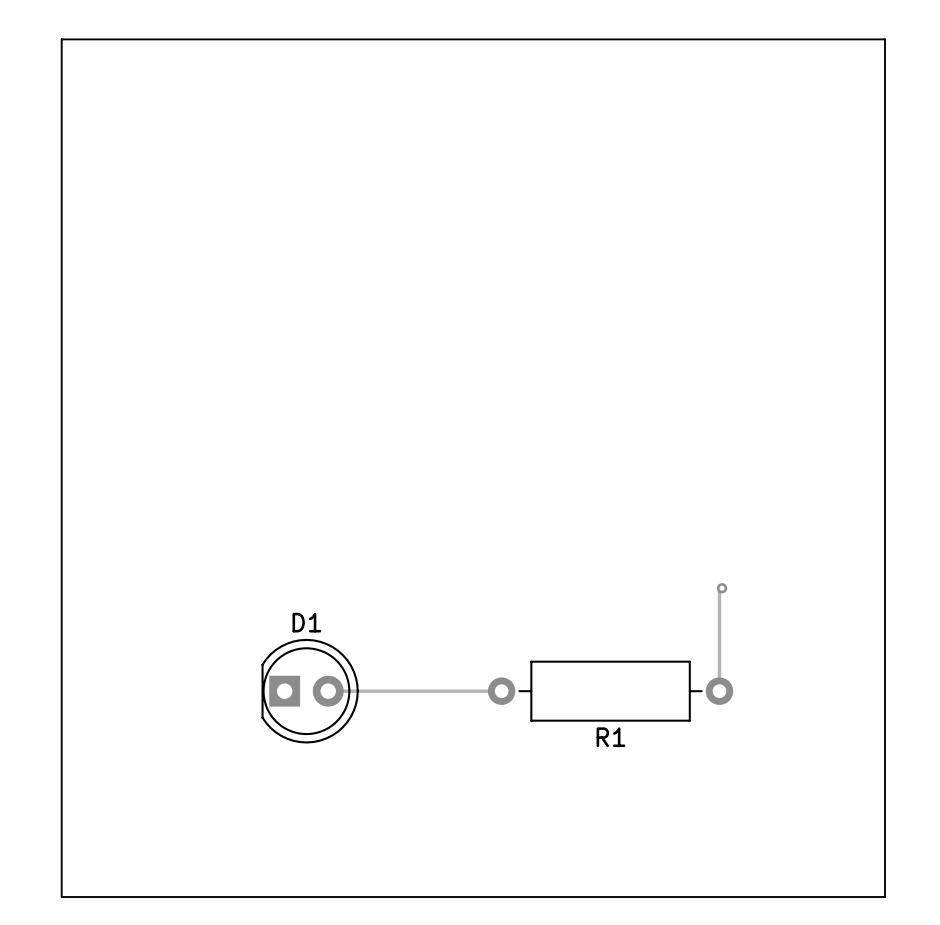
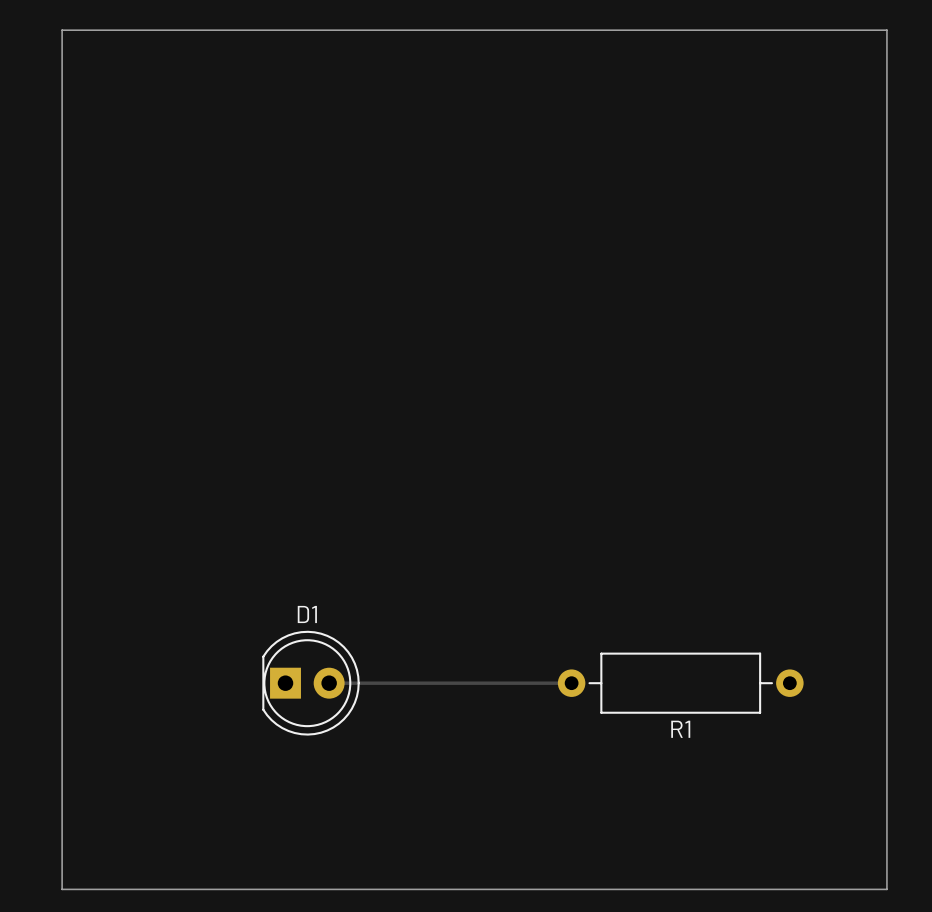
track: (722, 588) (719, 590) (719, 691) -> none
via: (722, 588) -> none
track: none -> (502, 683) (571, 683)
R1 position: (610, 691) -> (680, 683)

